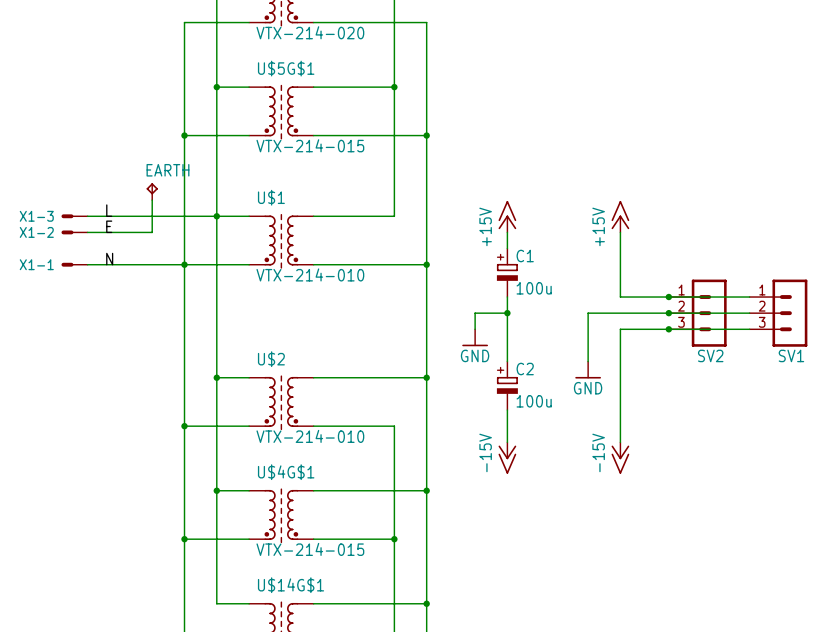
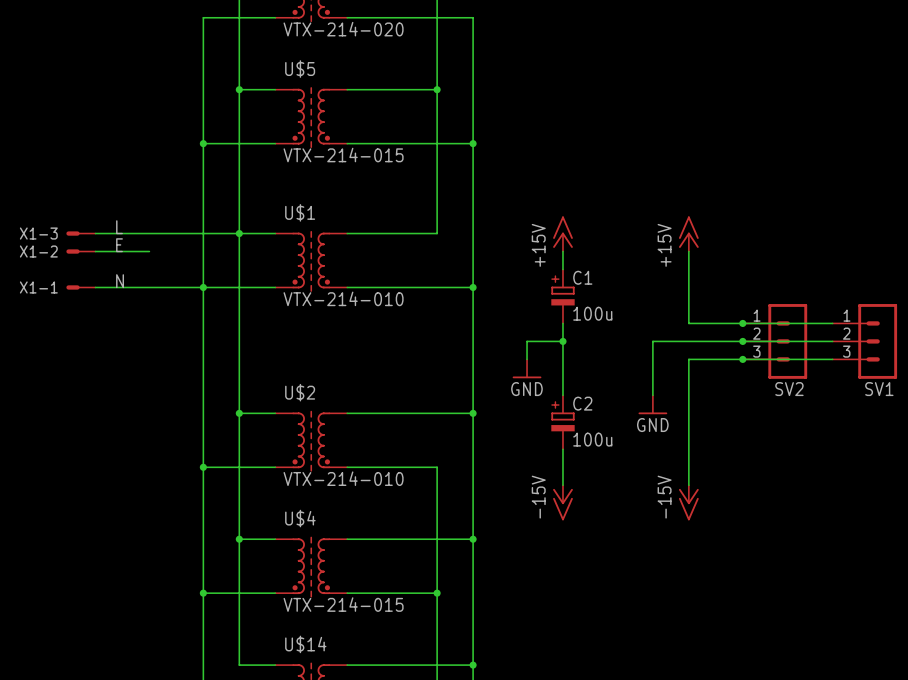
U$5G$1 name: U$5G$1 (286, 68) -> U$5 (300, 69)
EARTH: (152, 191) -> none
wire: (152, 200) (152, 232) (136, 232) -> none
U$4G$1 name: U$4G$1 (286, 472) -> U$4 (300, 518)
U$14G$1 name: U$14G$1 (291, 585) -> U$14 (305, 644)

